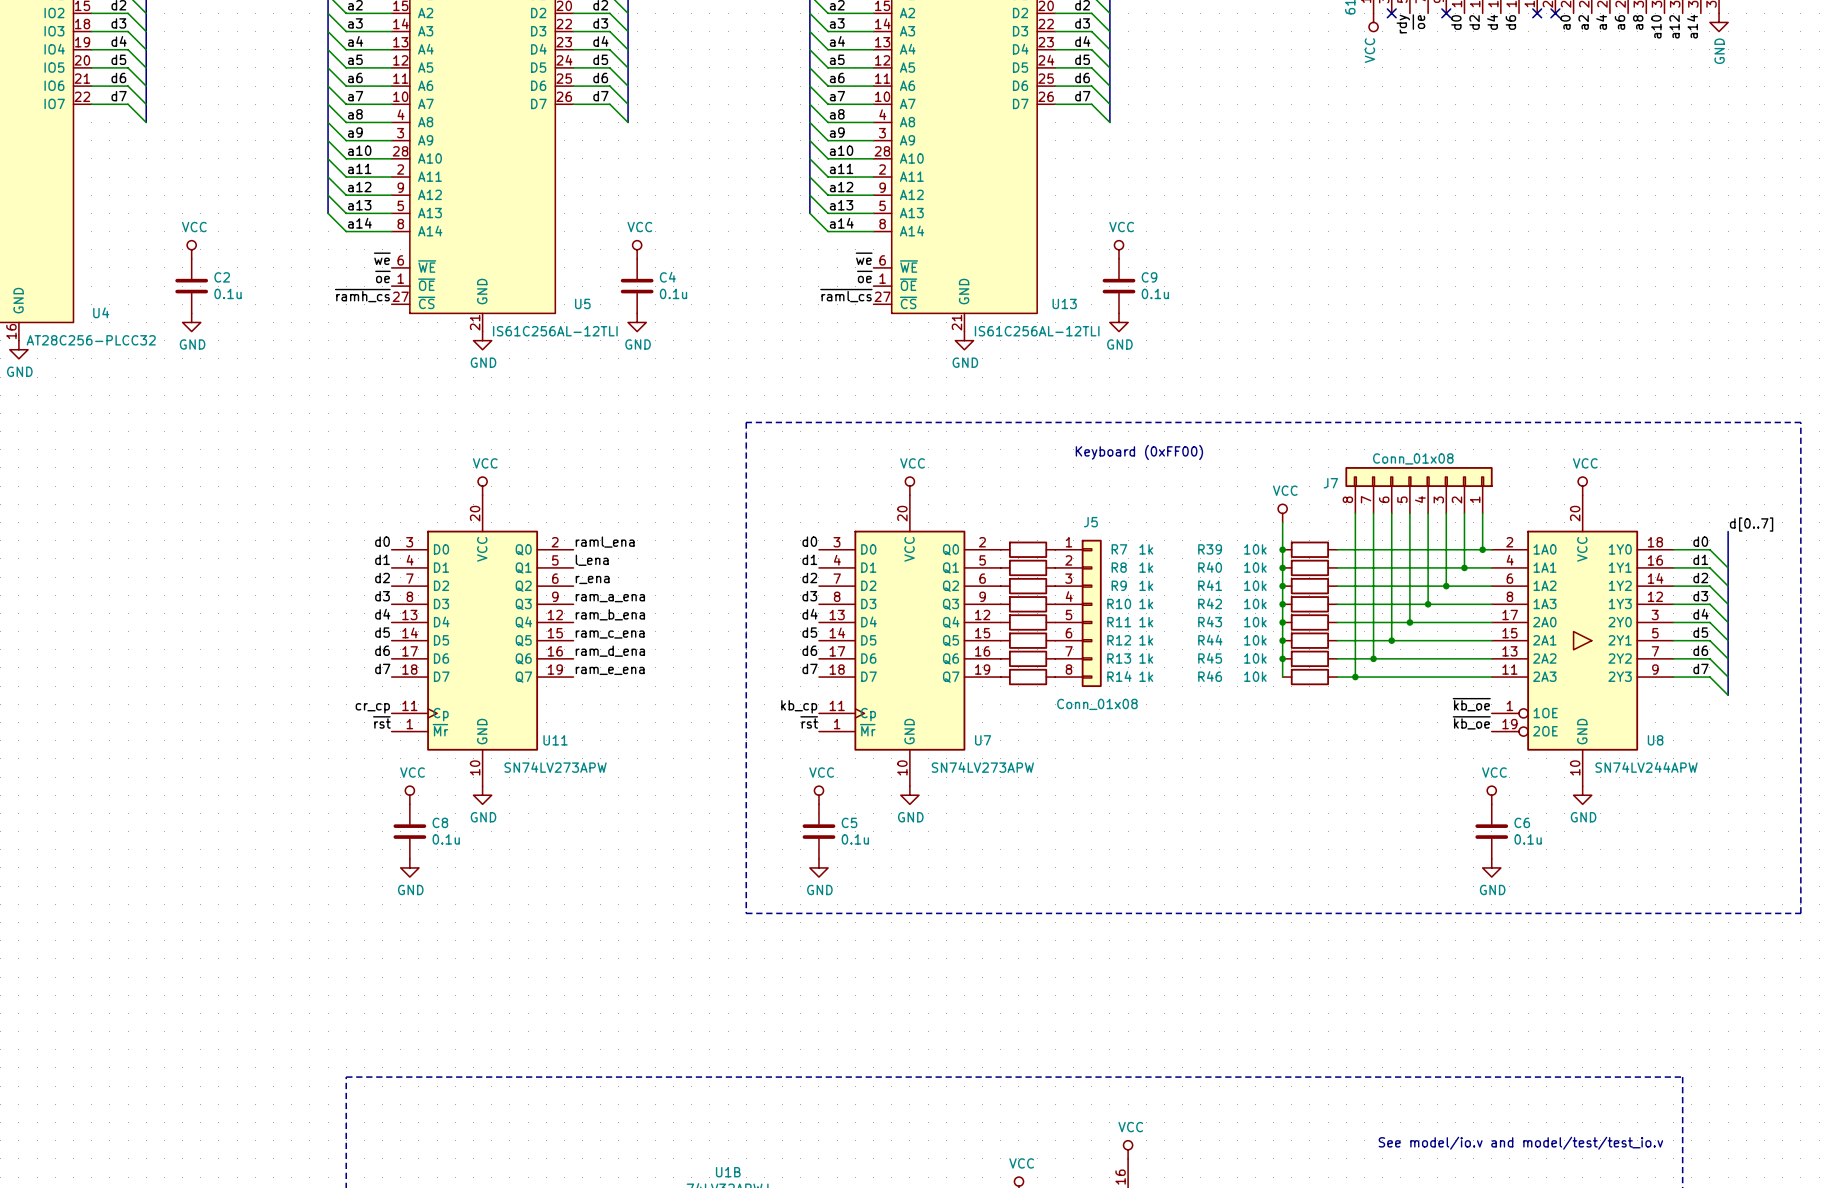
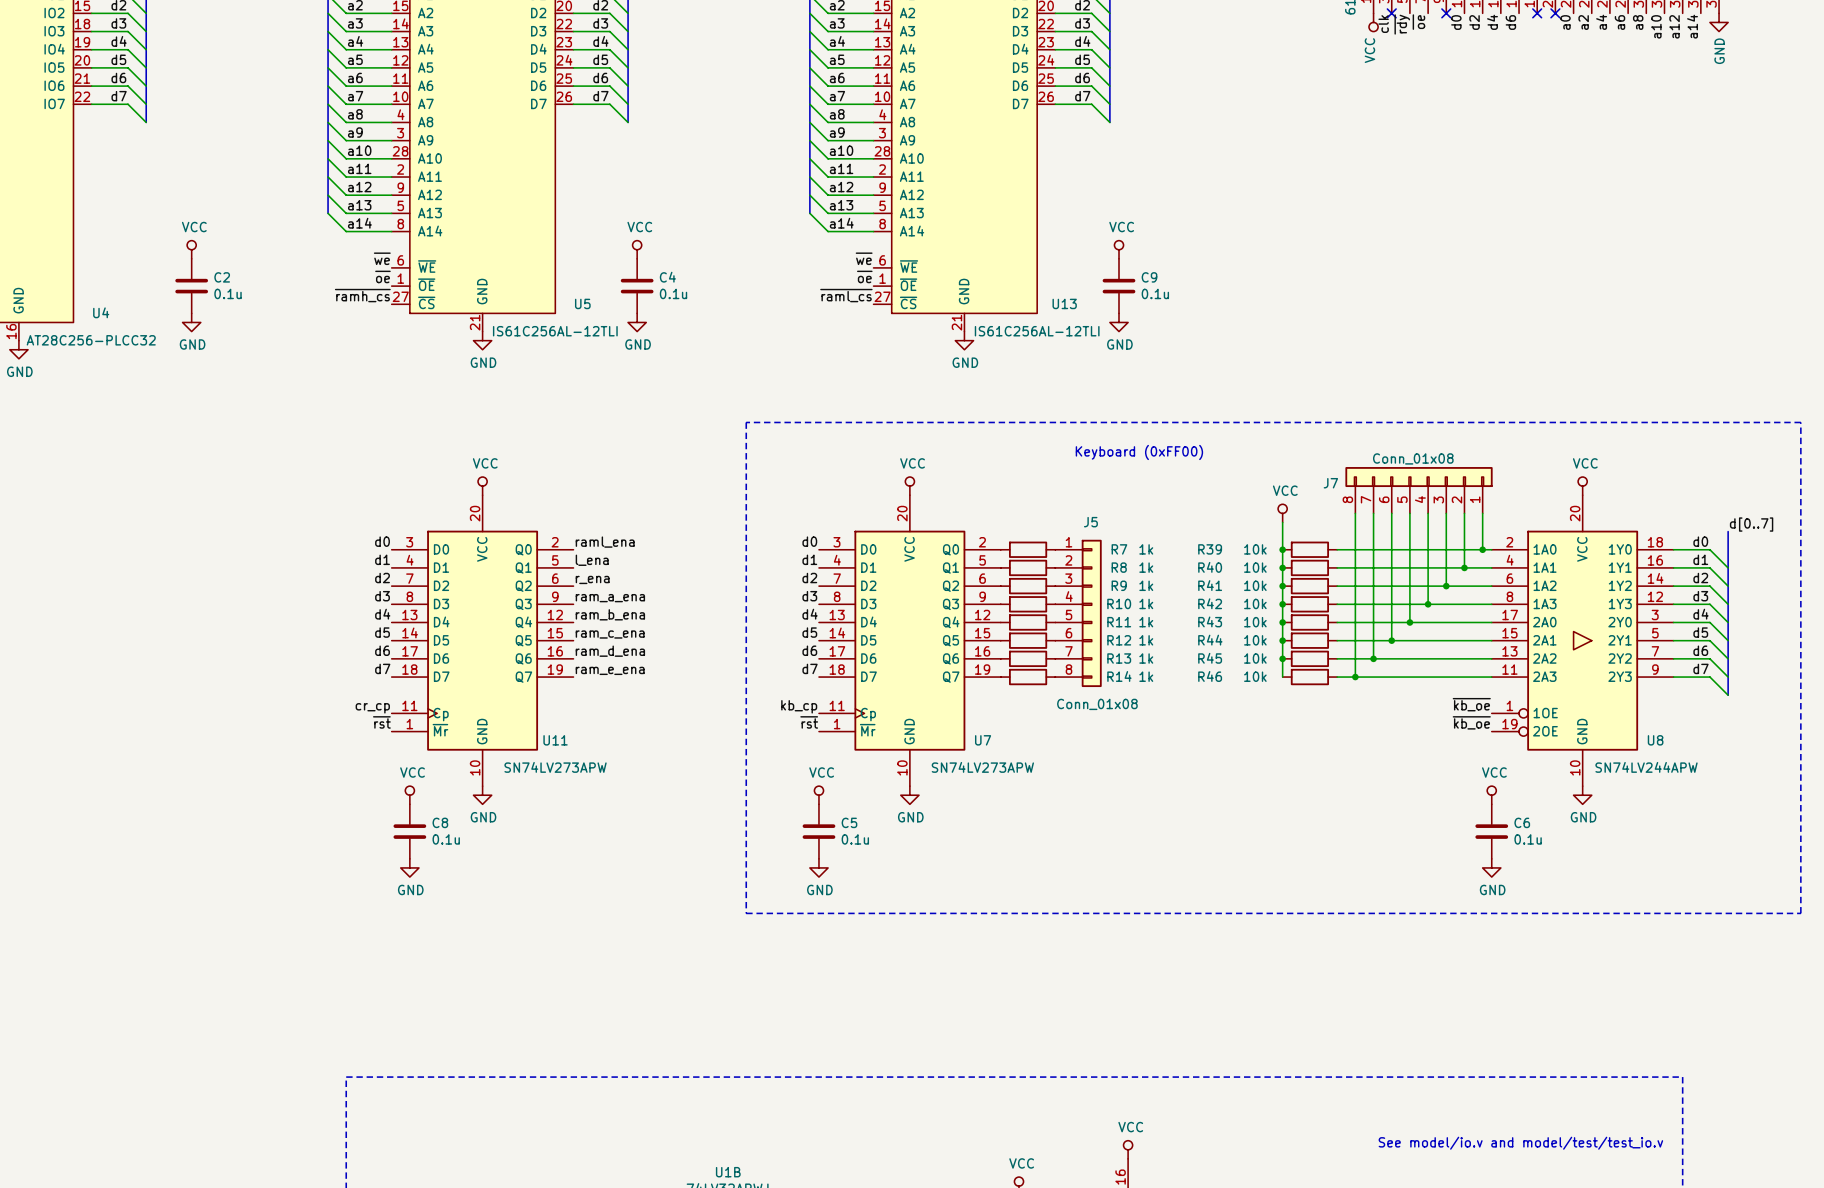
label: none -> clk (1383, 24)
label: rdy (1403, 24) -> ~{rdy} (1402, 24)

